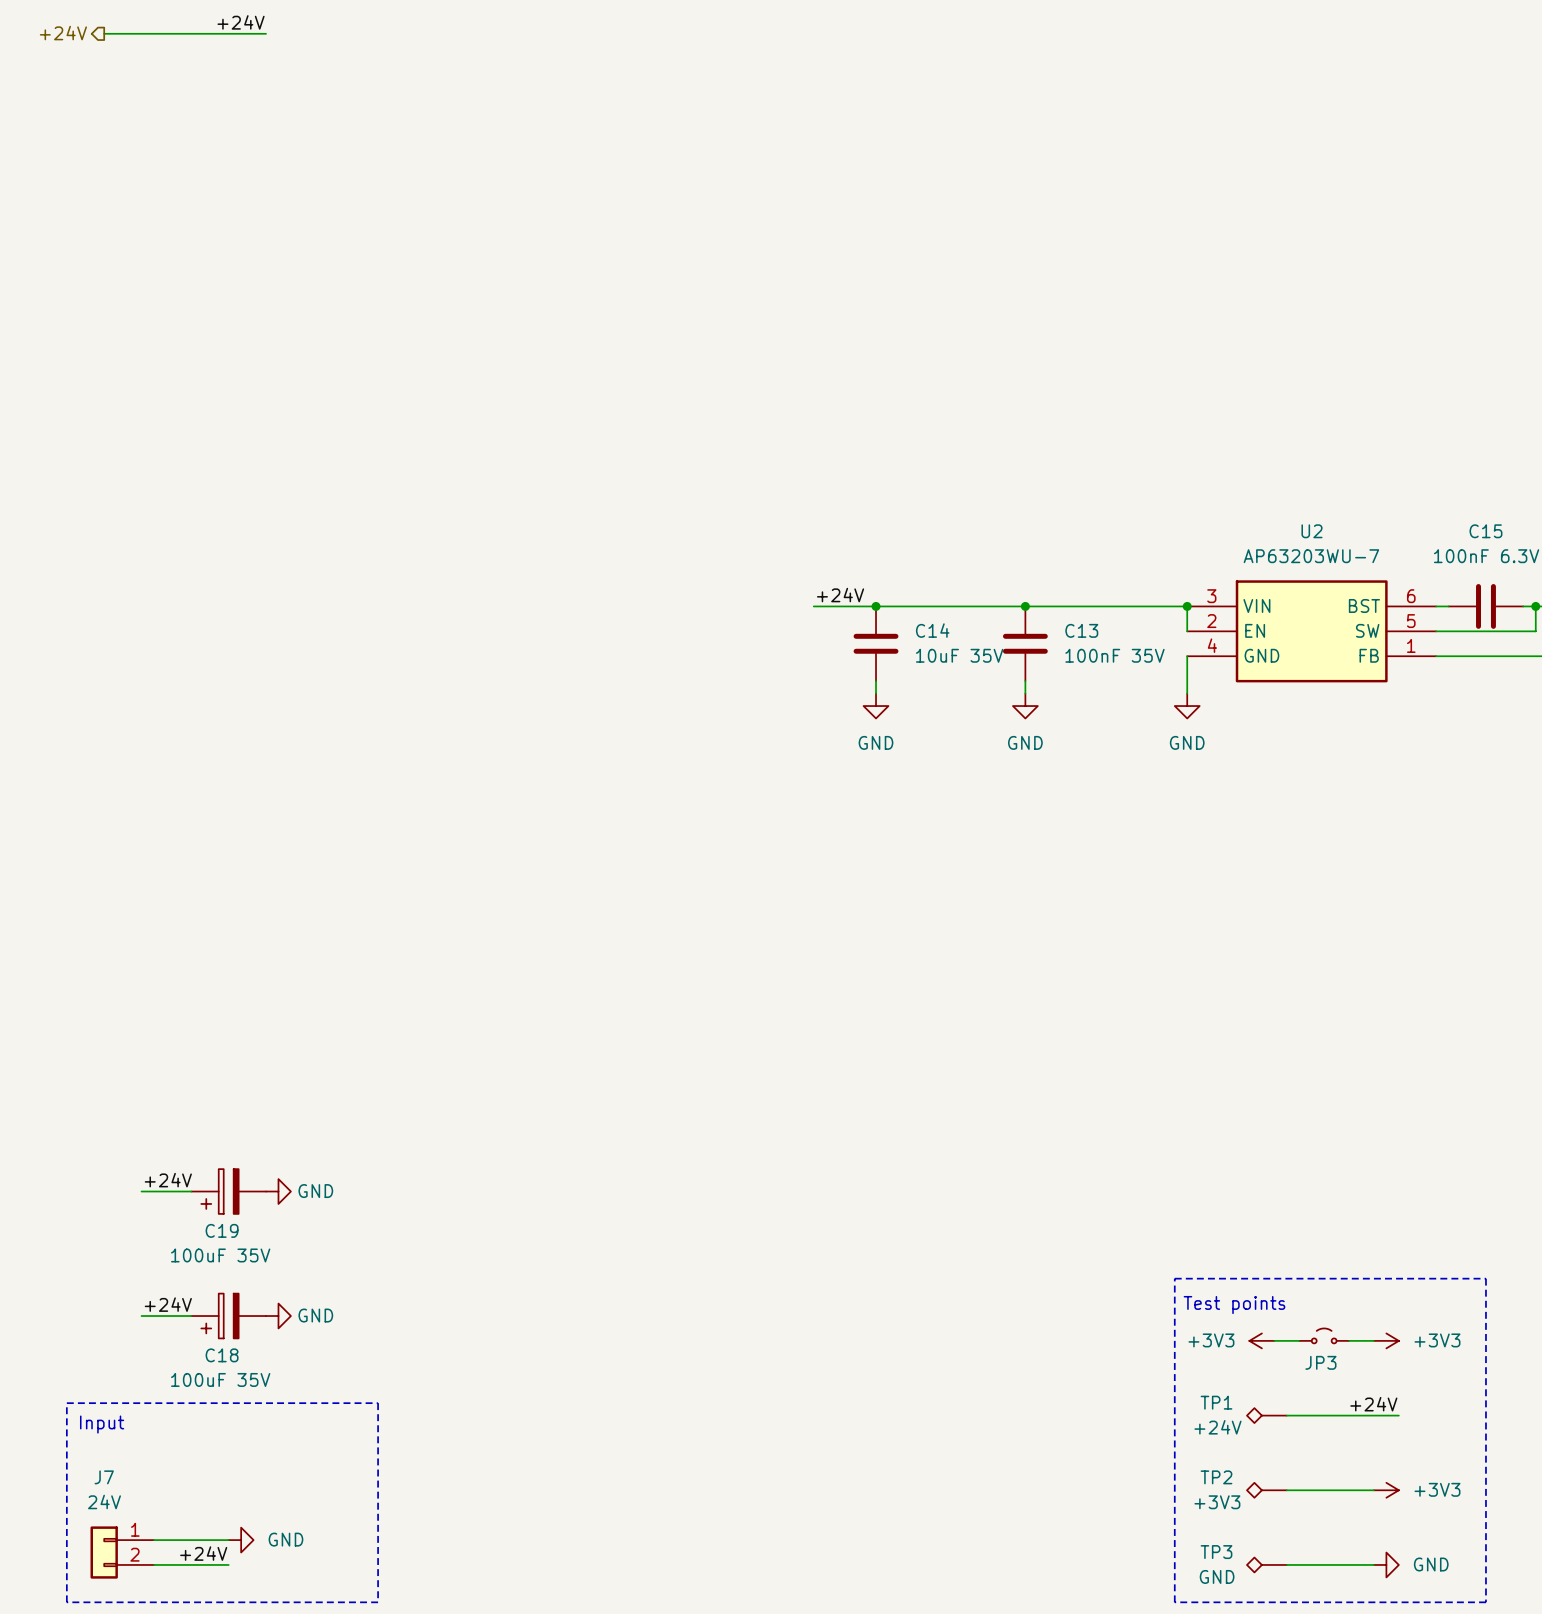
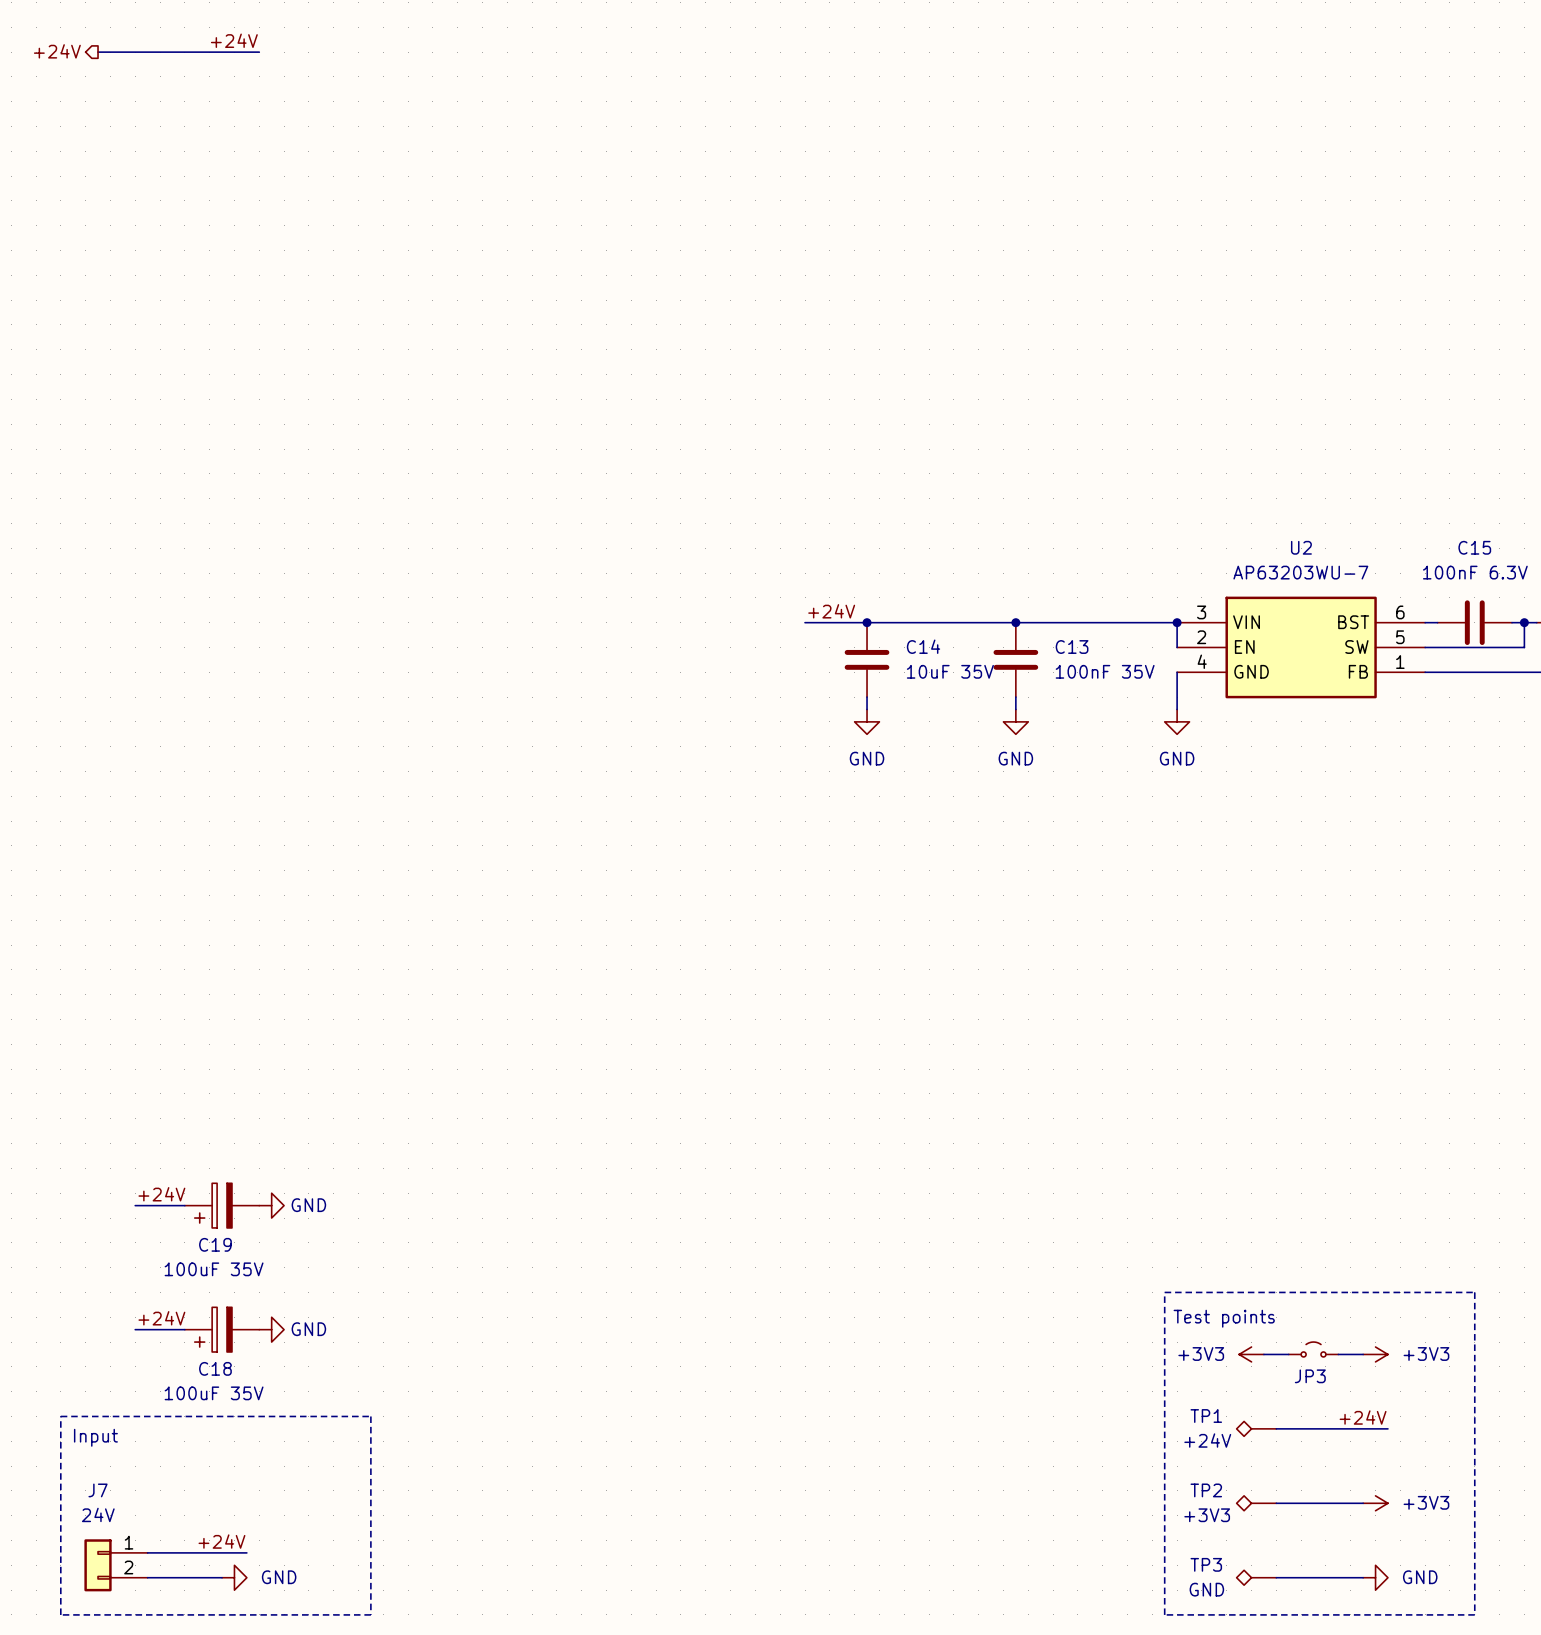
power symbol position: GND (241, 1540) -> GND (234, 1577)
label position: +24V (203, 1553) -> +24V (221, 1541)

